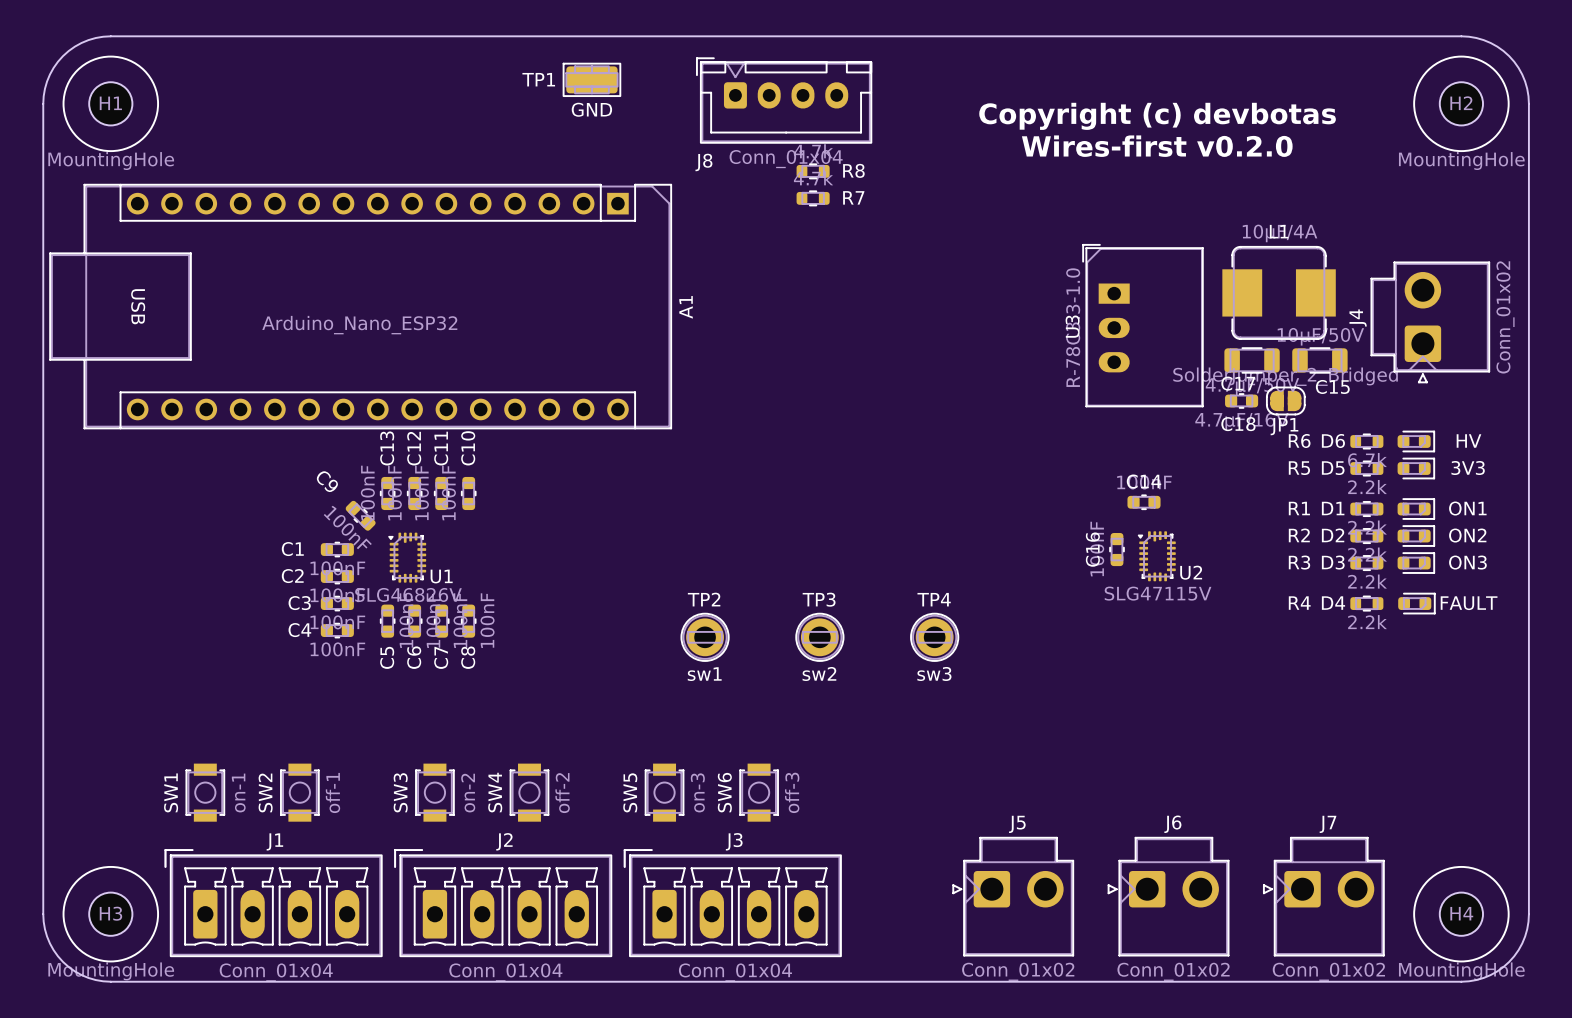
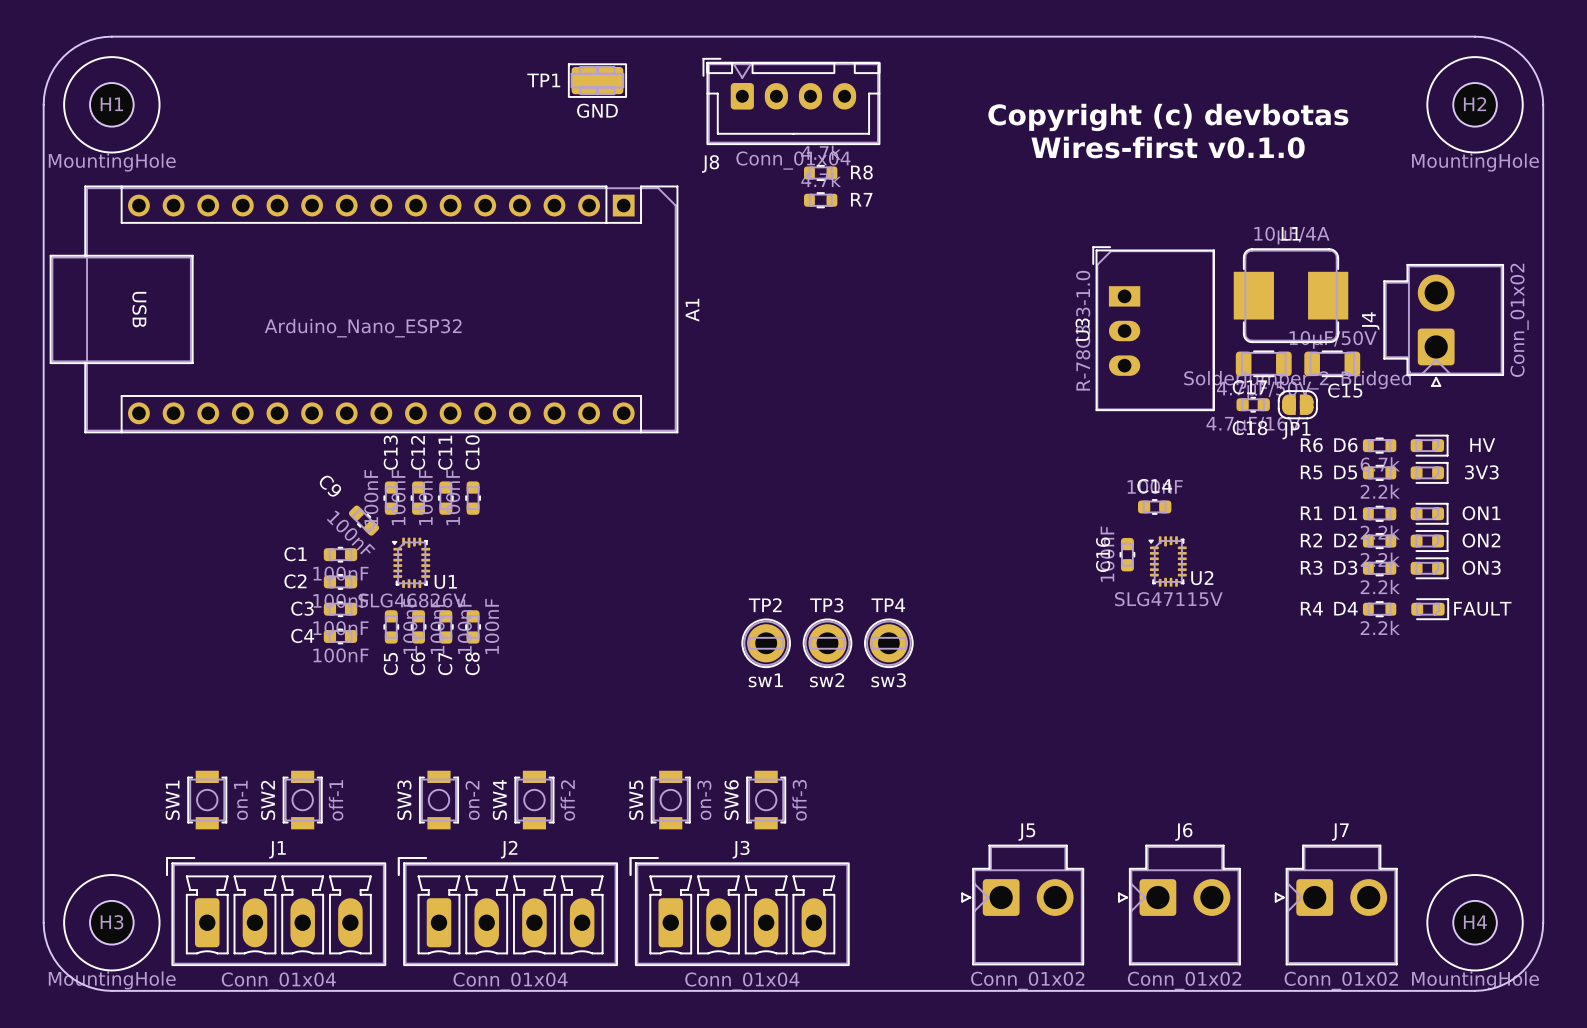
text: Wires-first v0.2.0 (1157, 146) -> Wires-first v0.1.0 (1168, 147)
TP2 position: (705, 637) -> (766, 643)
TP4 position: (934, 637) -> (888, 643)

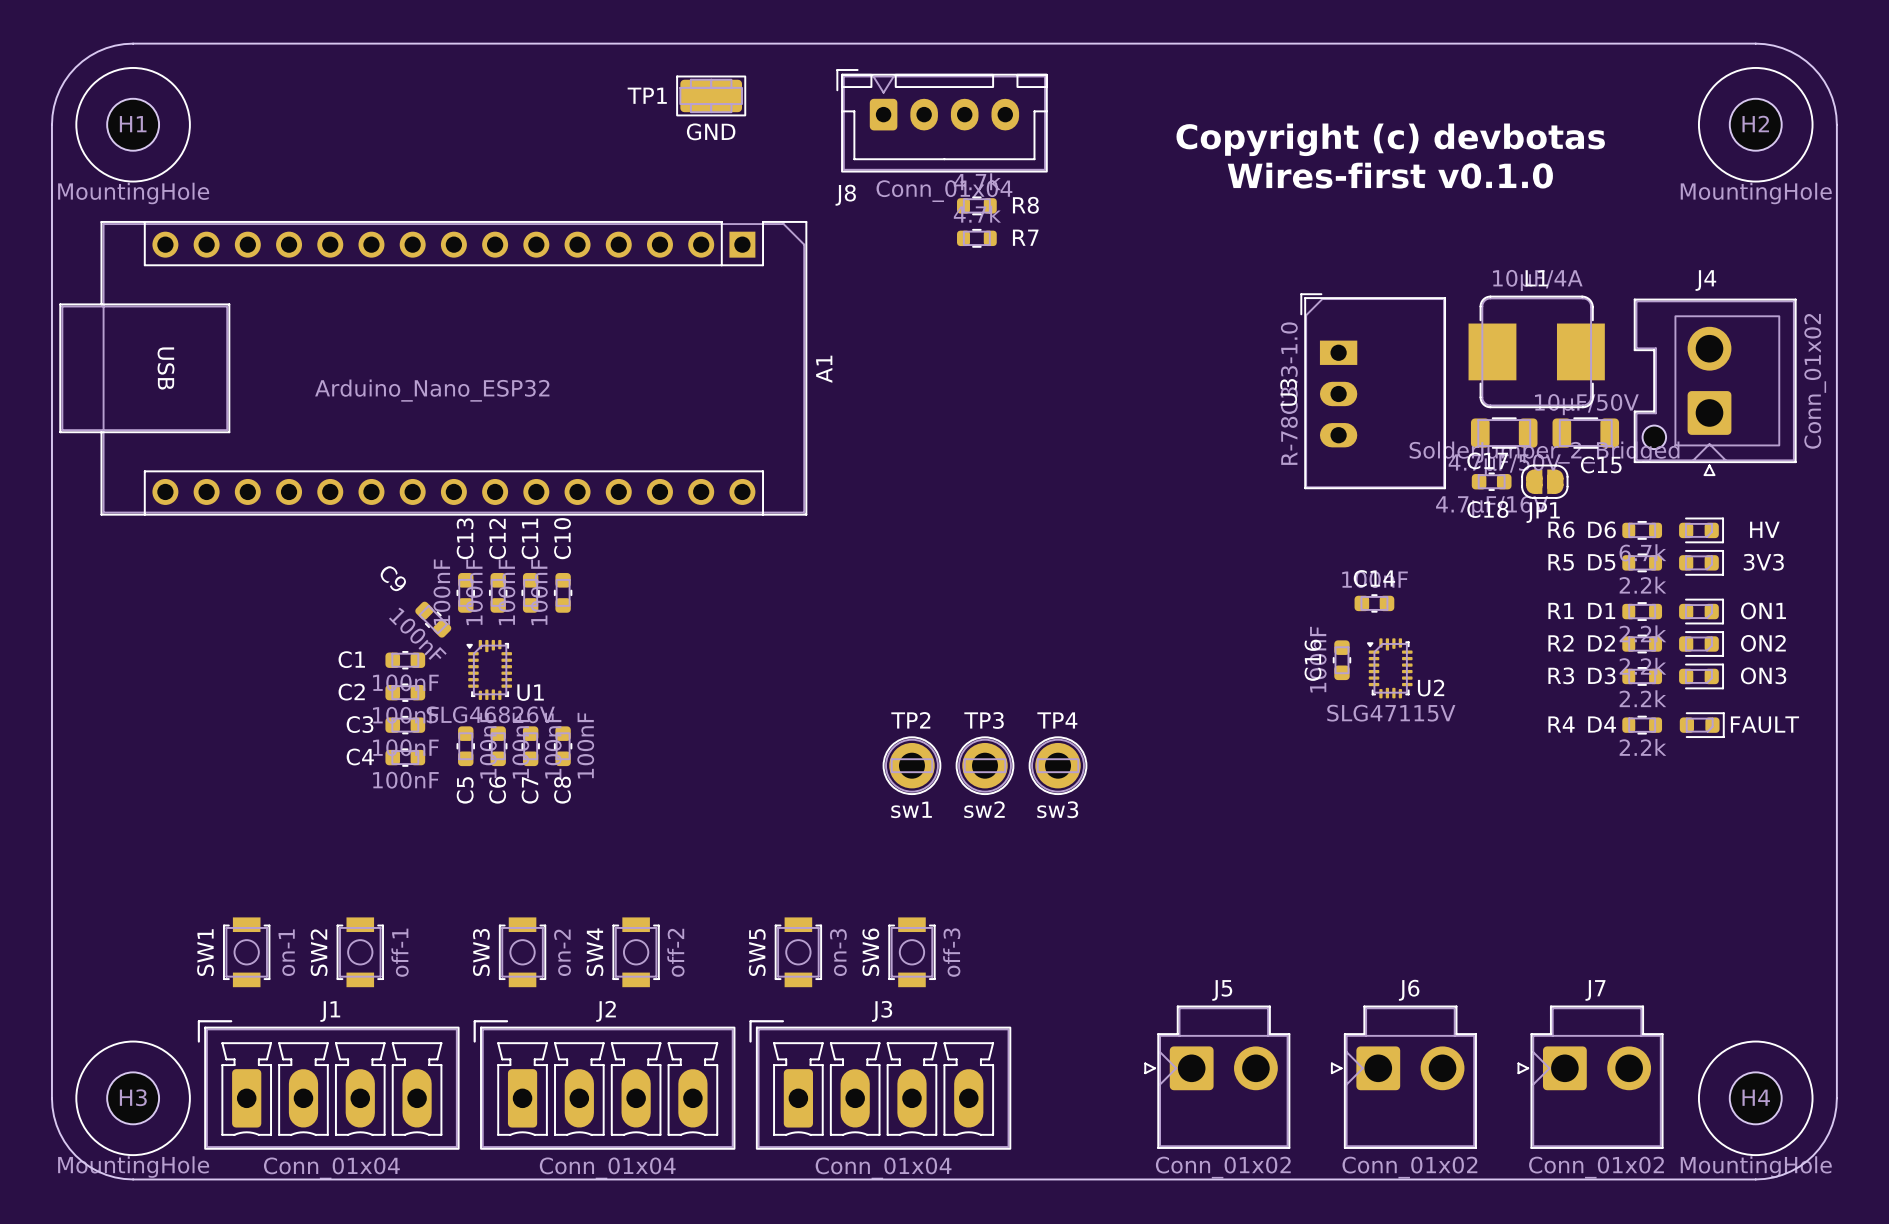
J4 footprint: [1383, 264, 1504, 387] -> [1633, 298, 1797, 477]
J4 name position: J4 (1370, 320) -> J4 (1705, 280)

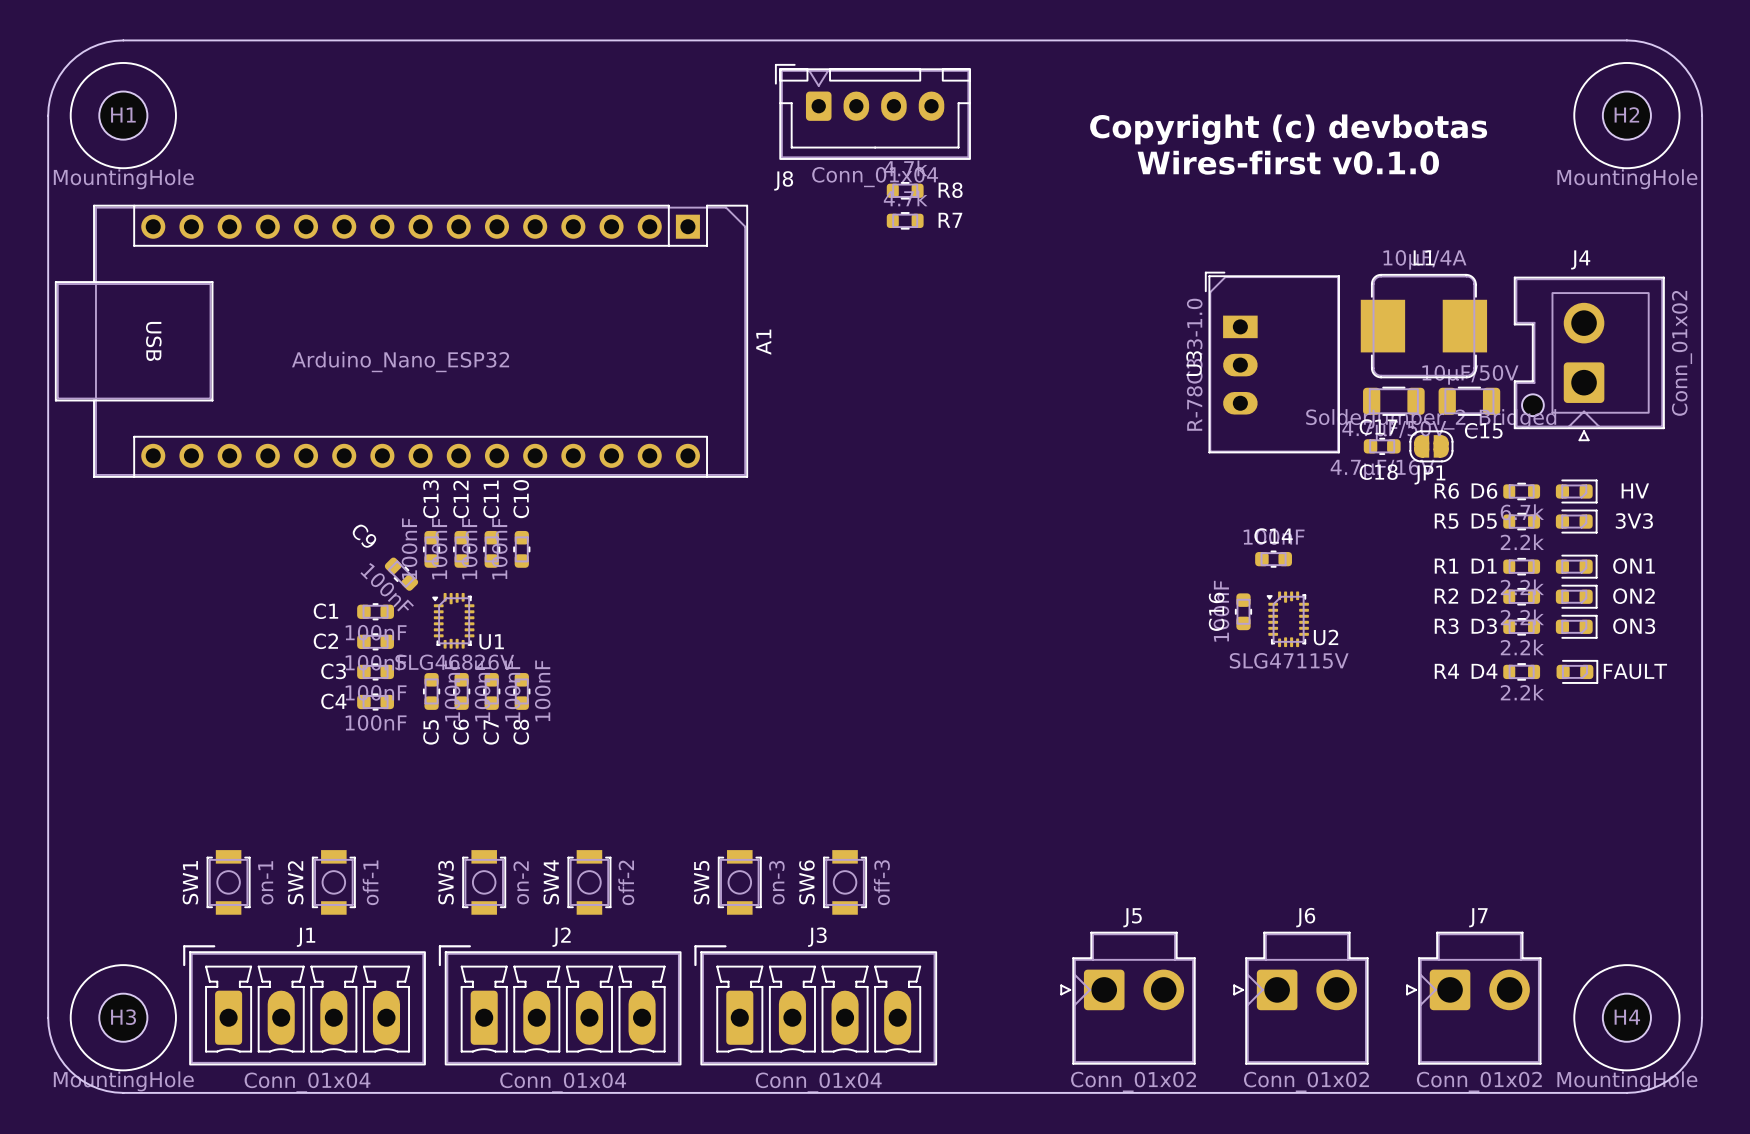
TP1: GND (711, 95) -> none
TP2: sw1 (911, 765) -> none
TP3: sw2 (984, 765) -> none
TP4: sw3 (1058, 765) -> none

